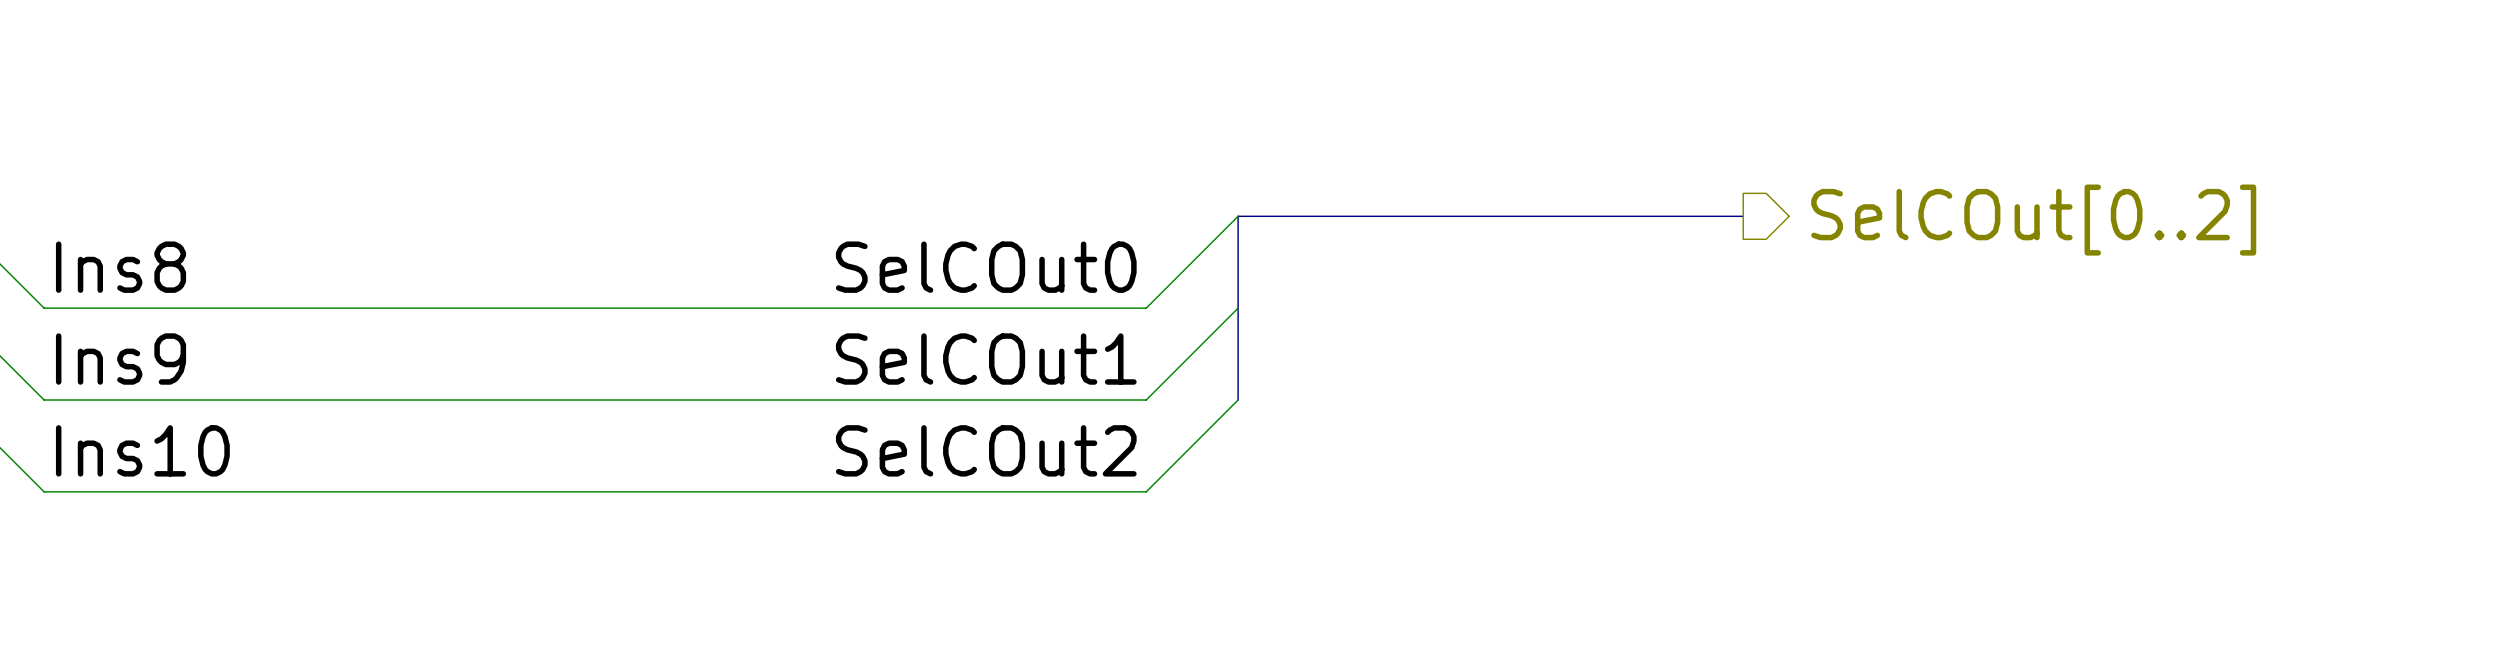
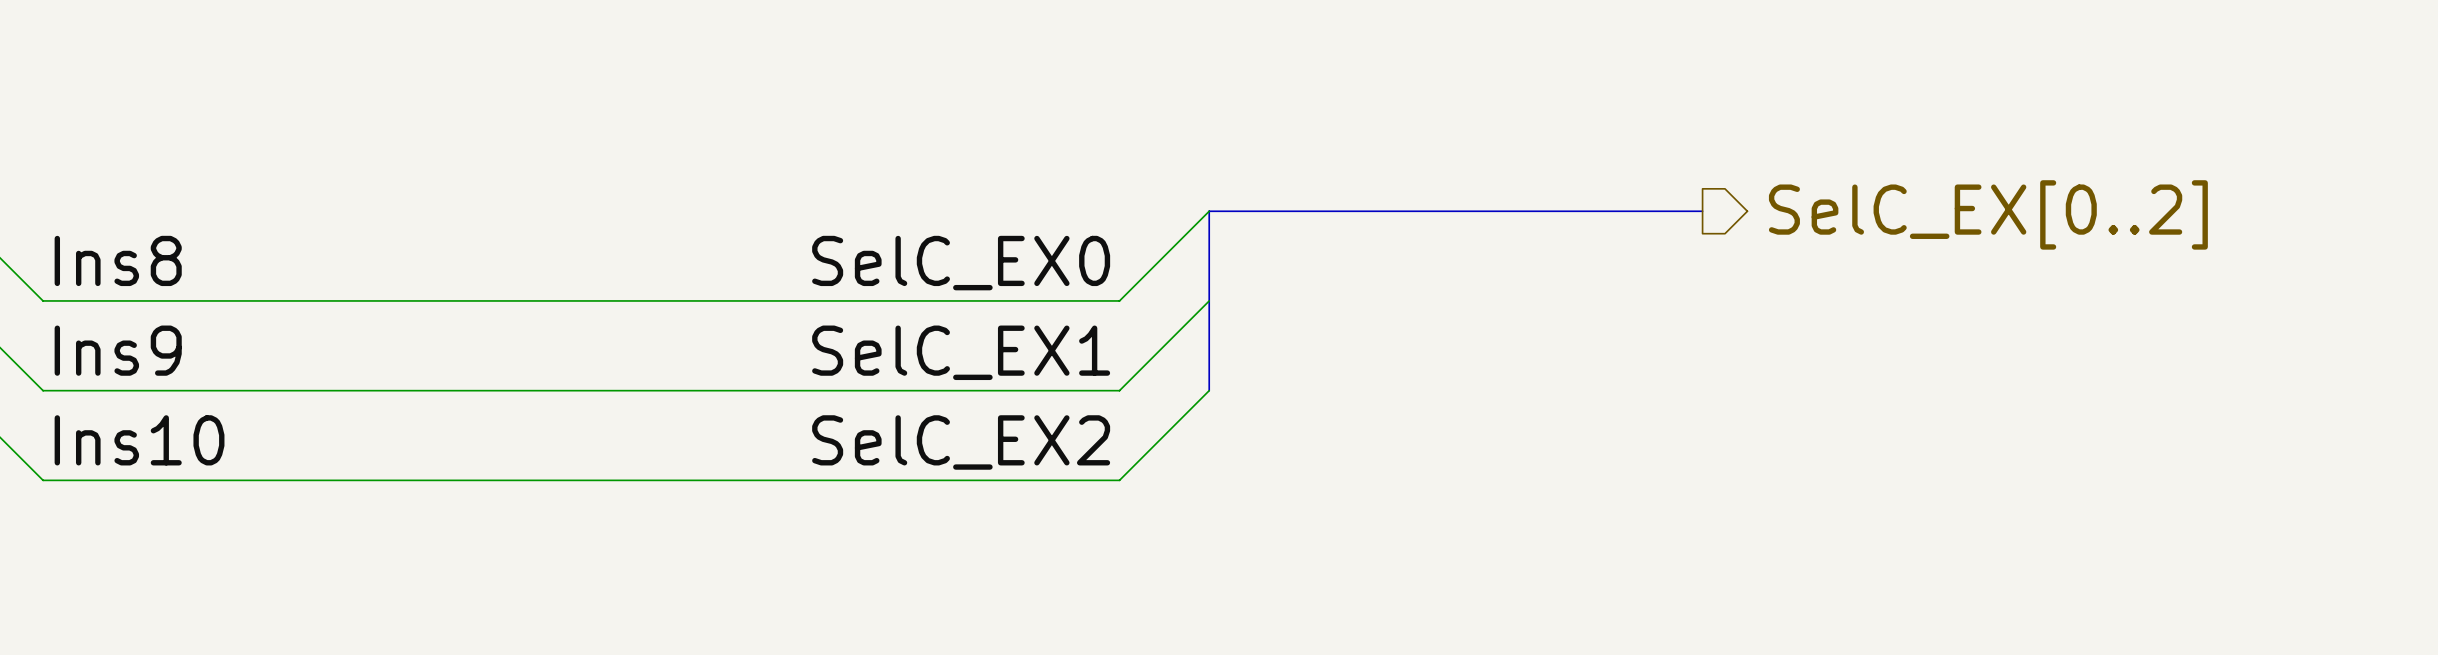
hierarchical label: SelCOut[0..2] (2033, 220) -> SelC_EX[0..2] (1988, 214)
label: SelCOut0 (986, 267) -> SelC_EX0 (961, 263)
label: SelCOut1 (986, 359) -> SelC_EX1 (961, 352)
label: SelCOut2 (986, 450) -> SelC_EX2 (961, 442)

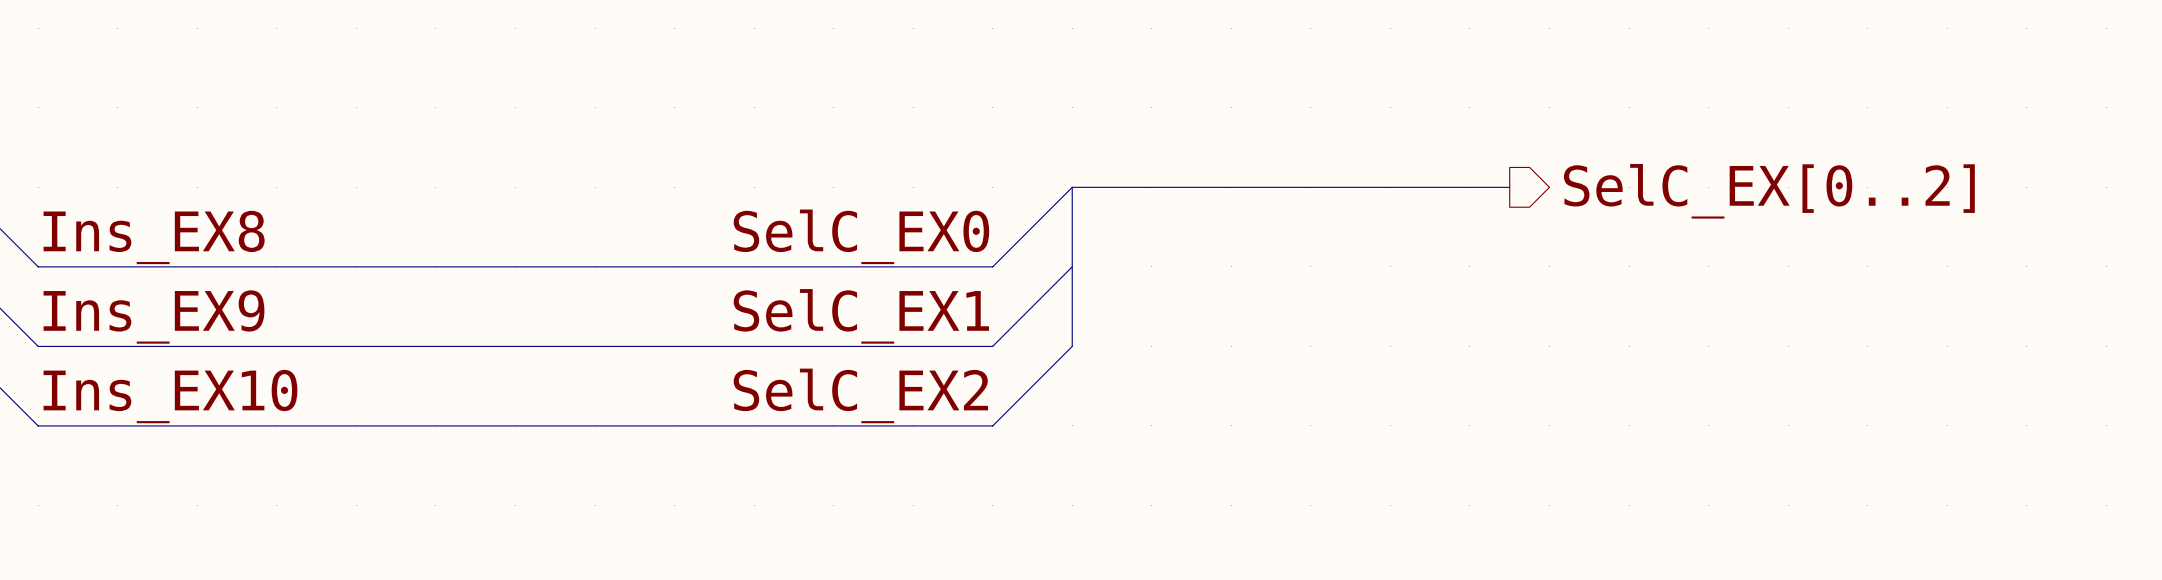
label: Ins8 (118, 260) -> Ins_EX8 (154, 237)
label: Ins9 (118, 350) -> Ins_EX9 (153, 317)
label: Ins10 (139, 440) -> Ins_EX10 (170, 396)

